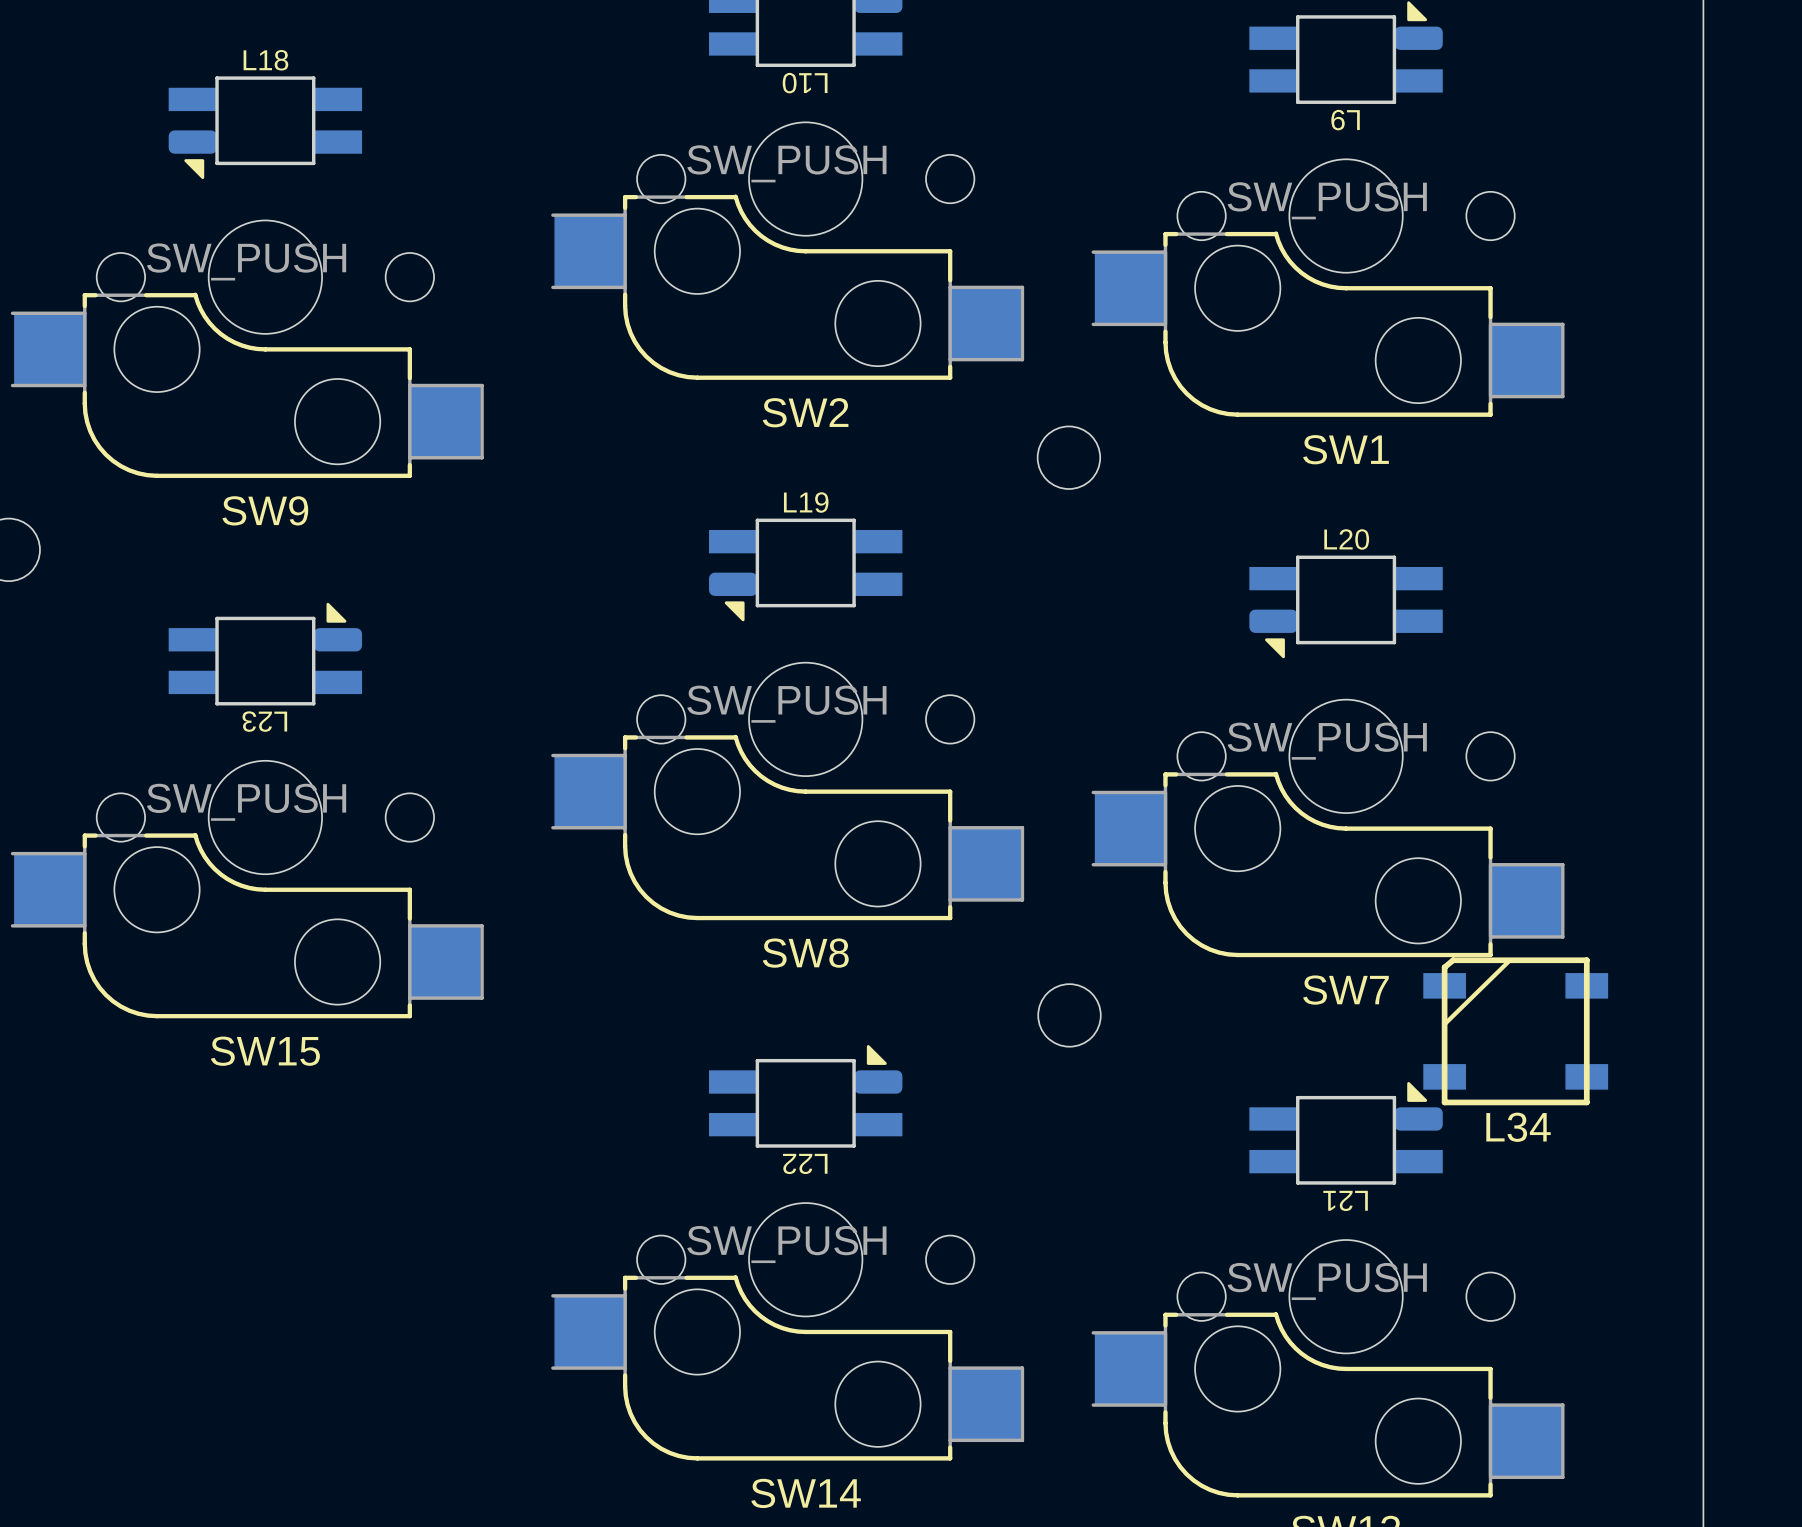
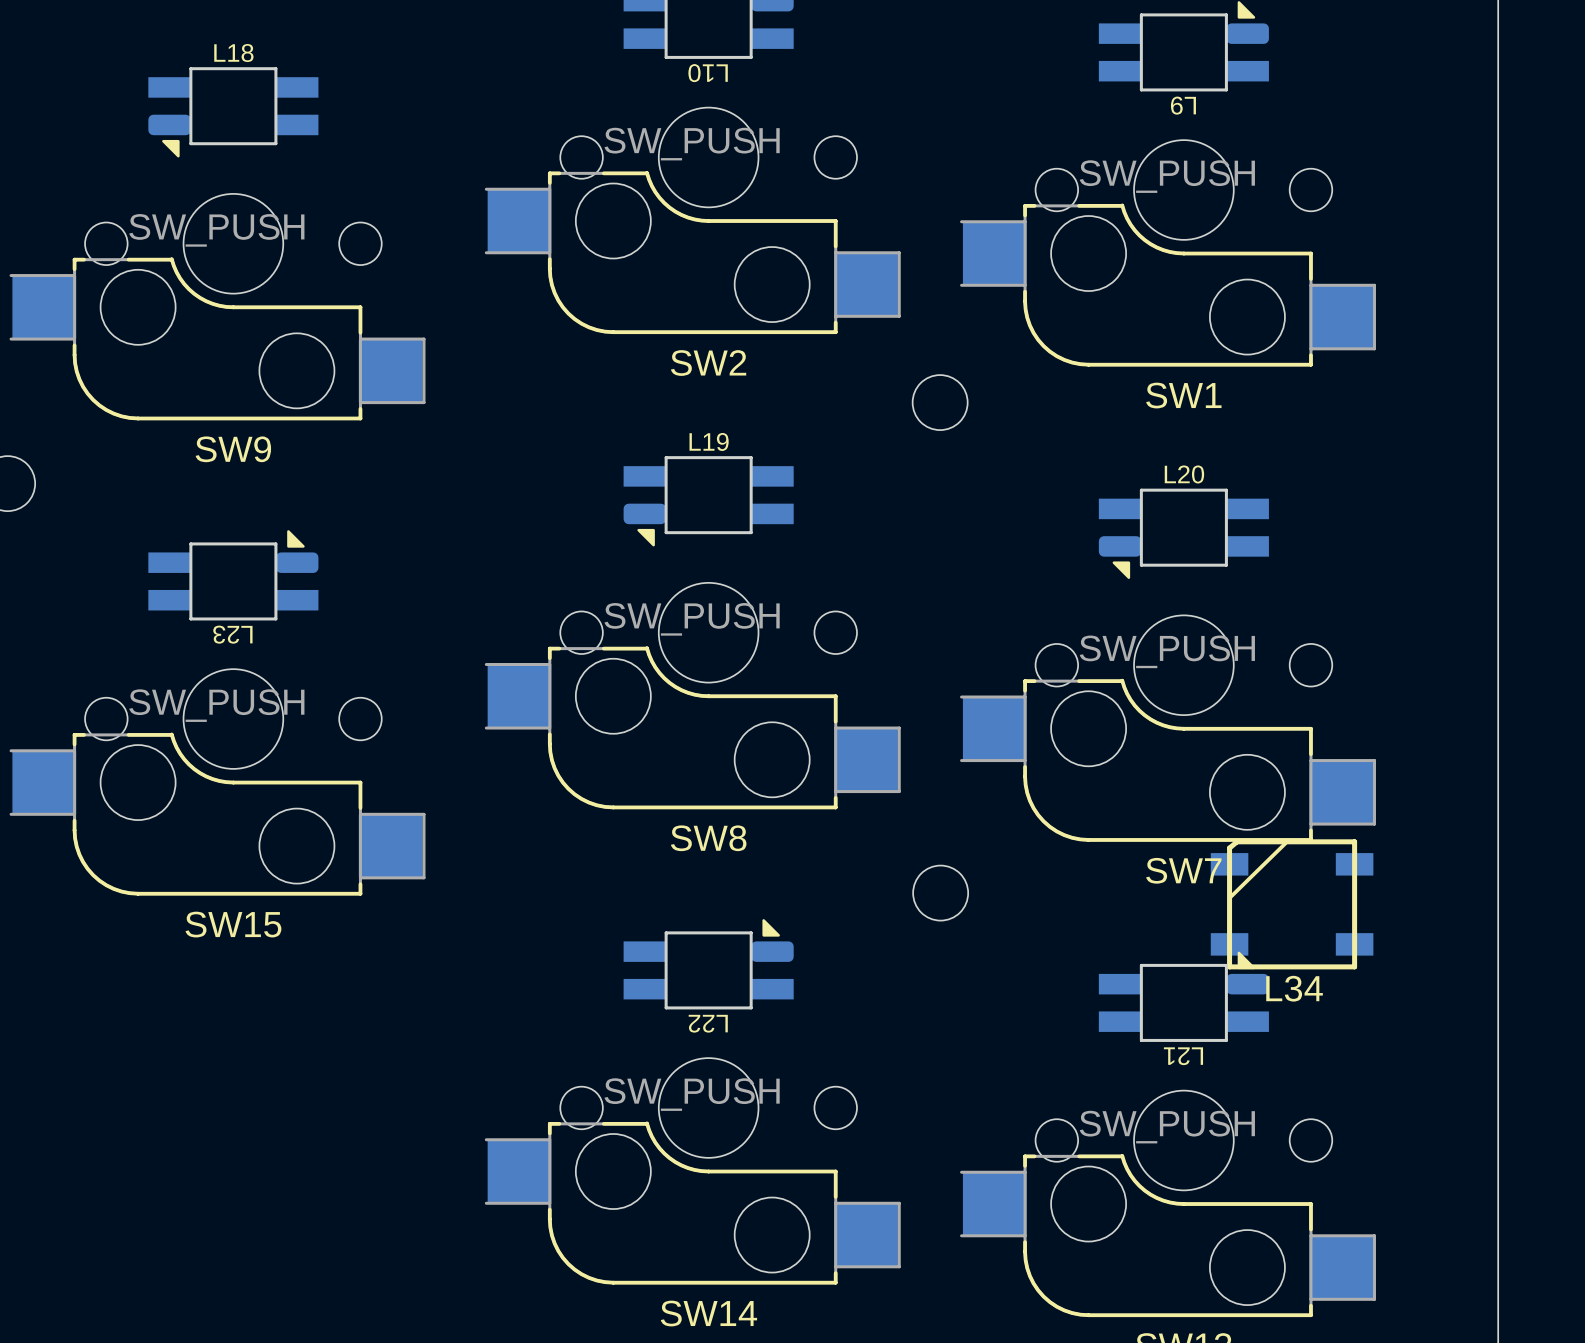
L34 position: (1515, 1031) -> (1292, 904)

